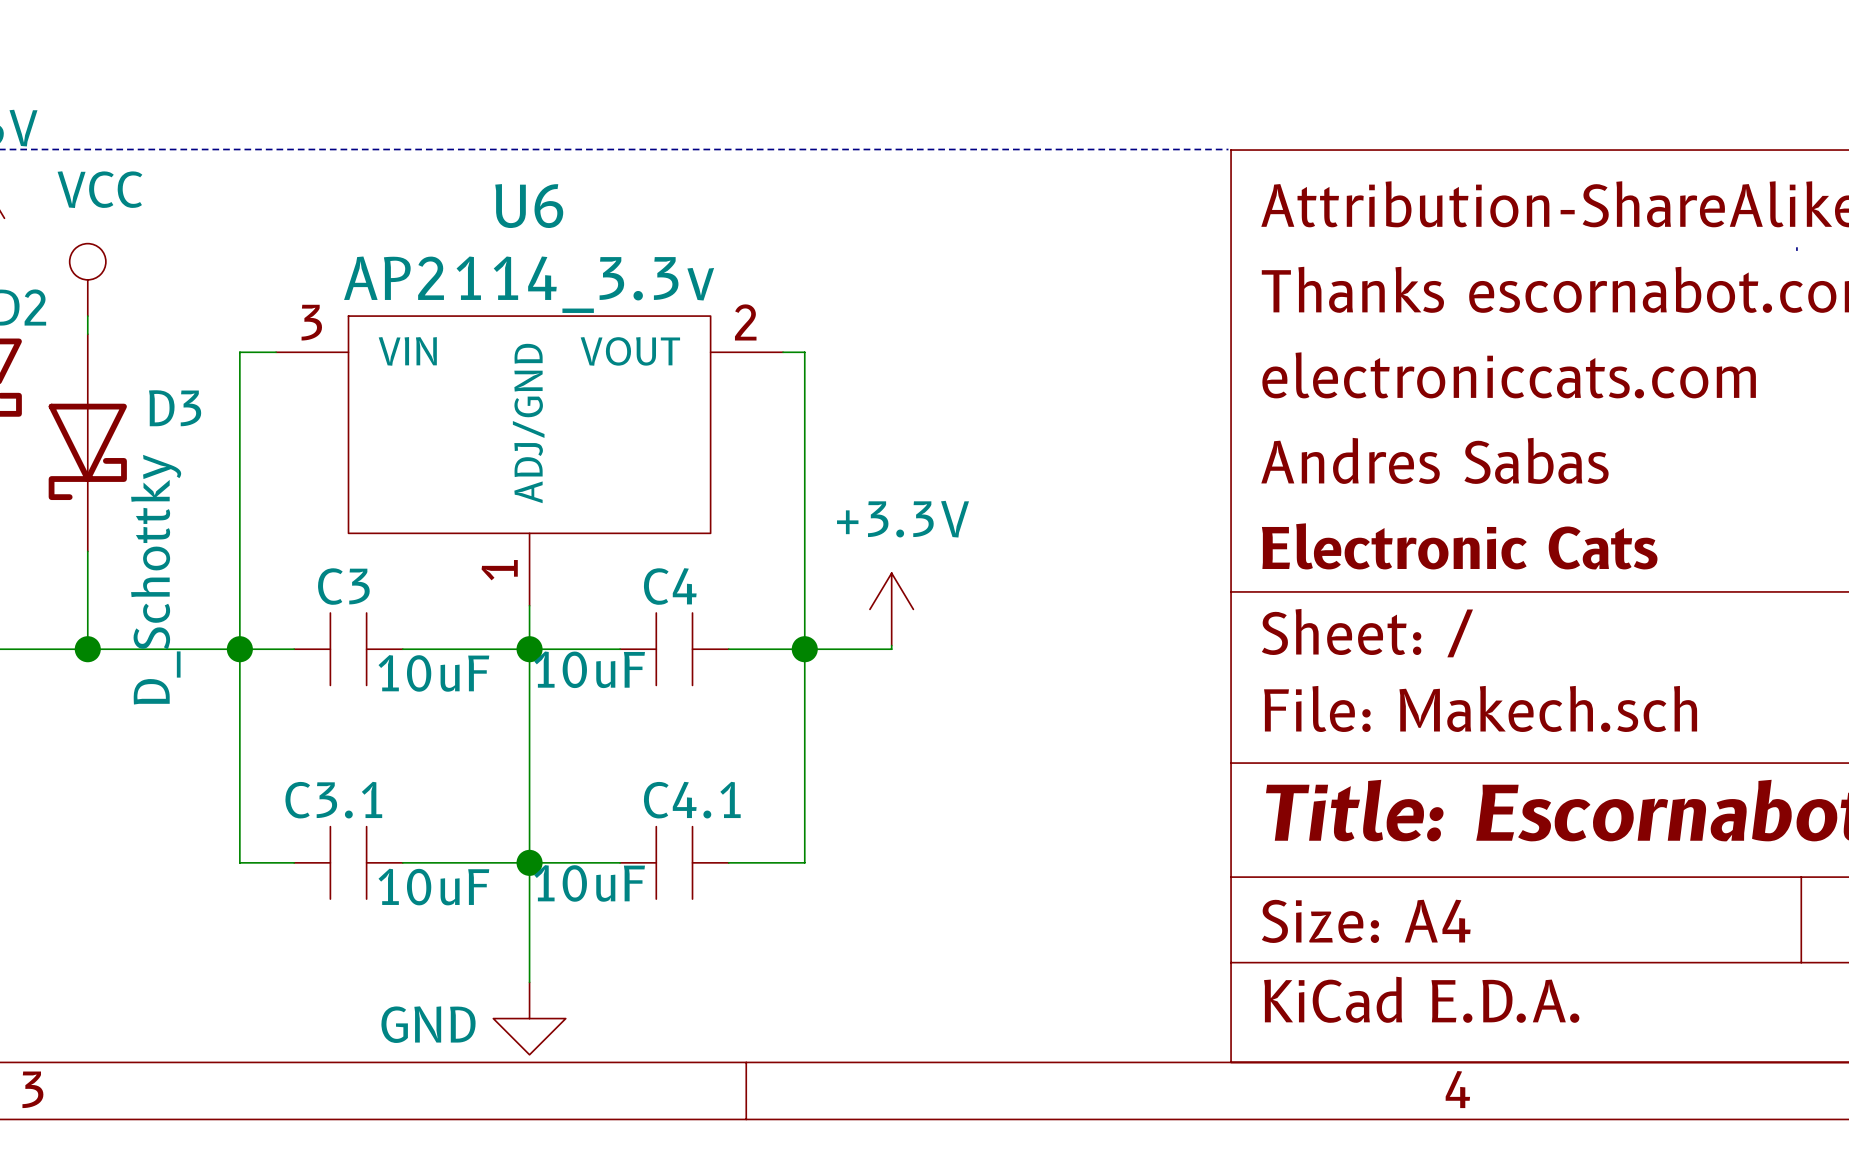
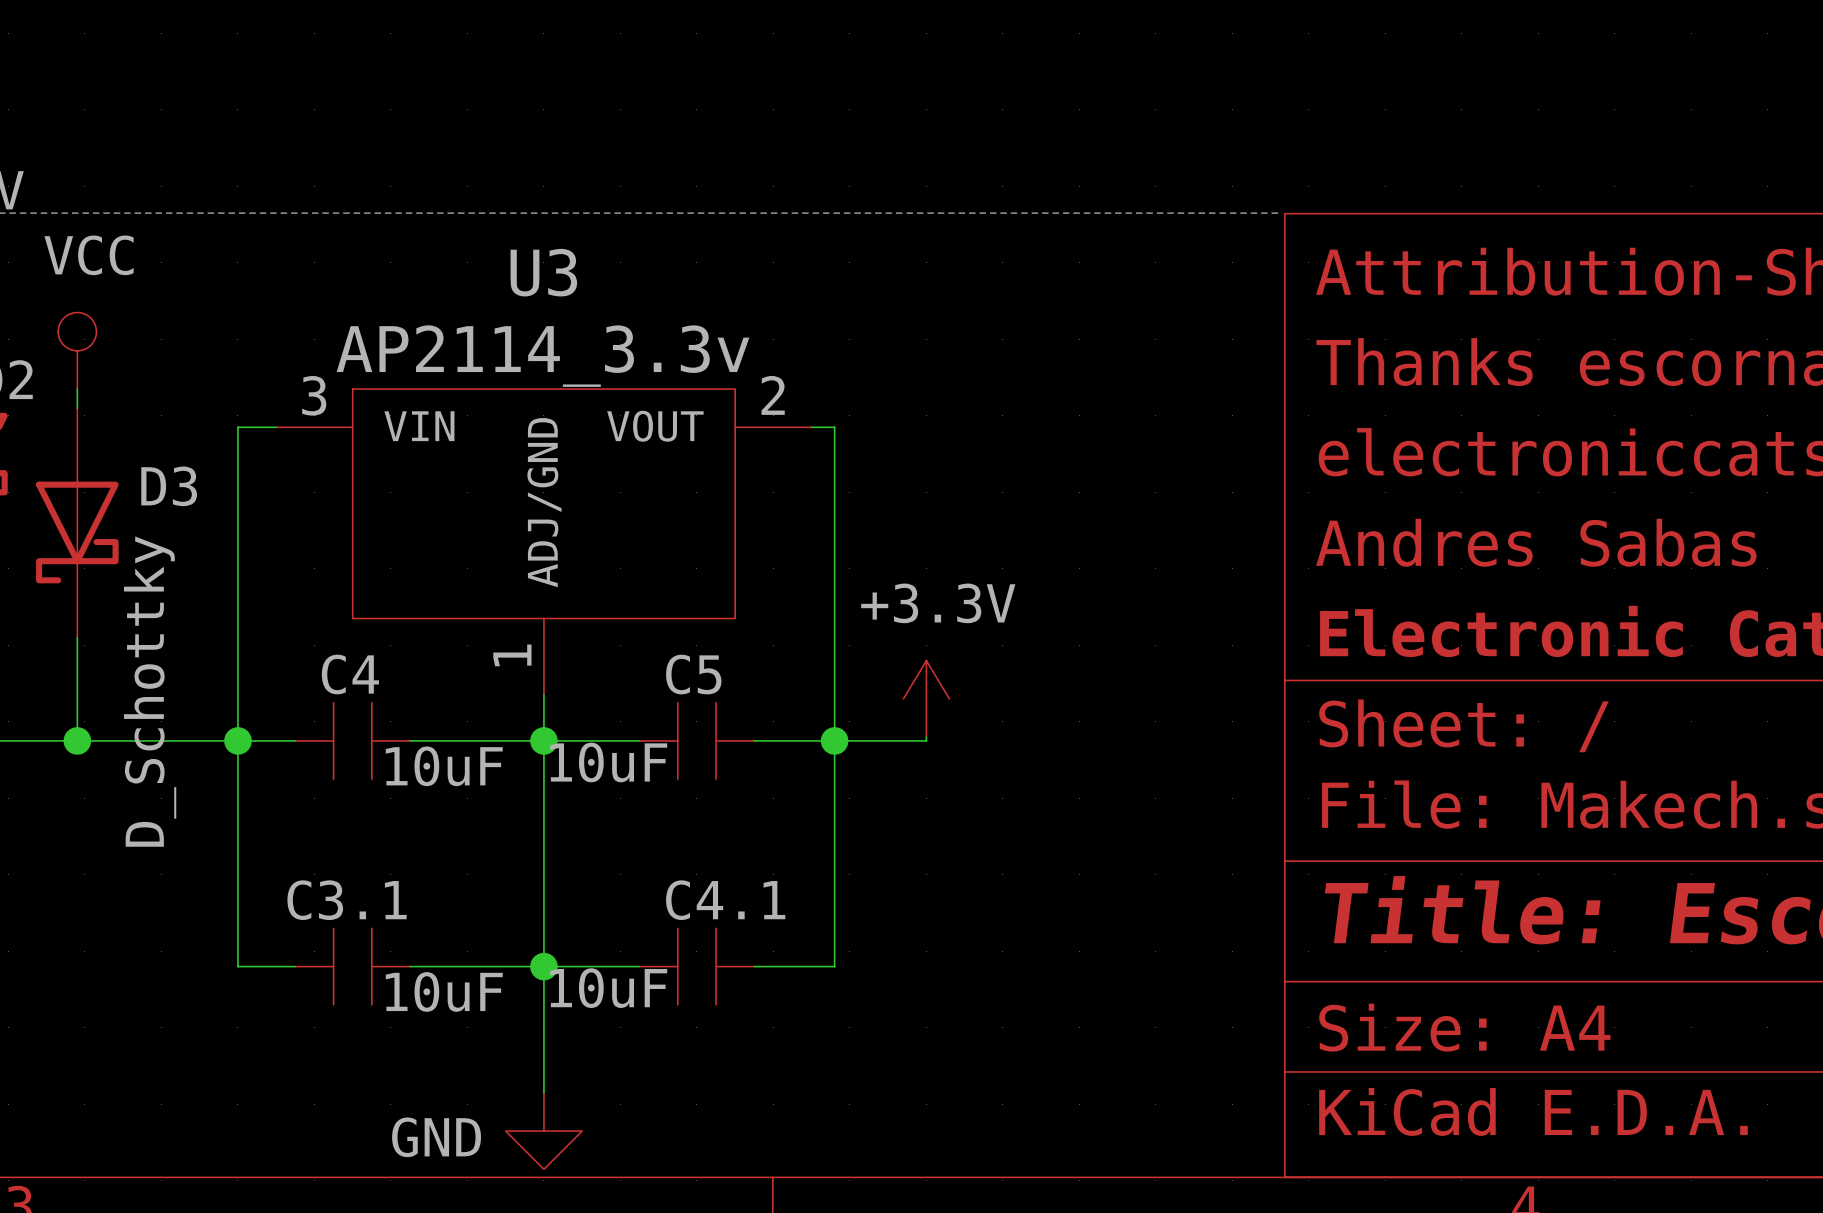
U6 name: U6 (529, 206) -> U3 (543, 272)
C3 name: C3 (343, 586) -> C4 (350, 674)
C4 name: C4 (670, 586) -> C5 (693, 674)

